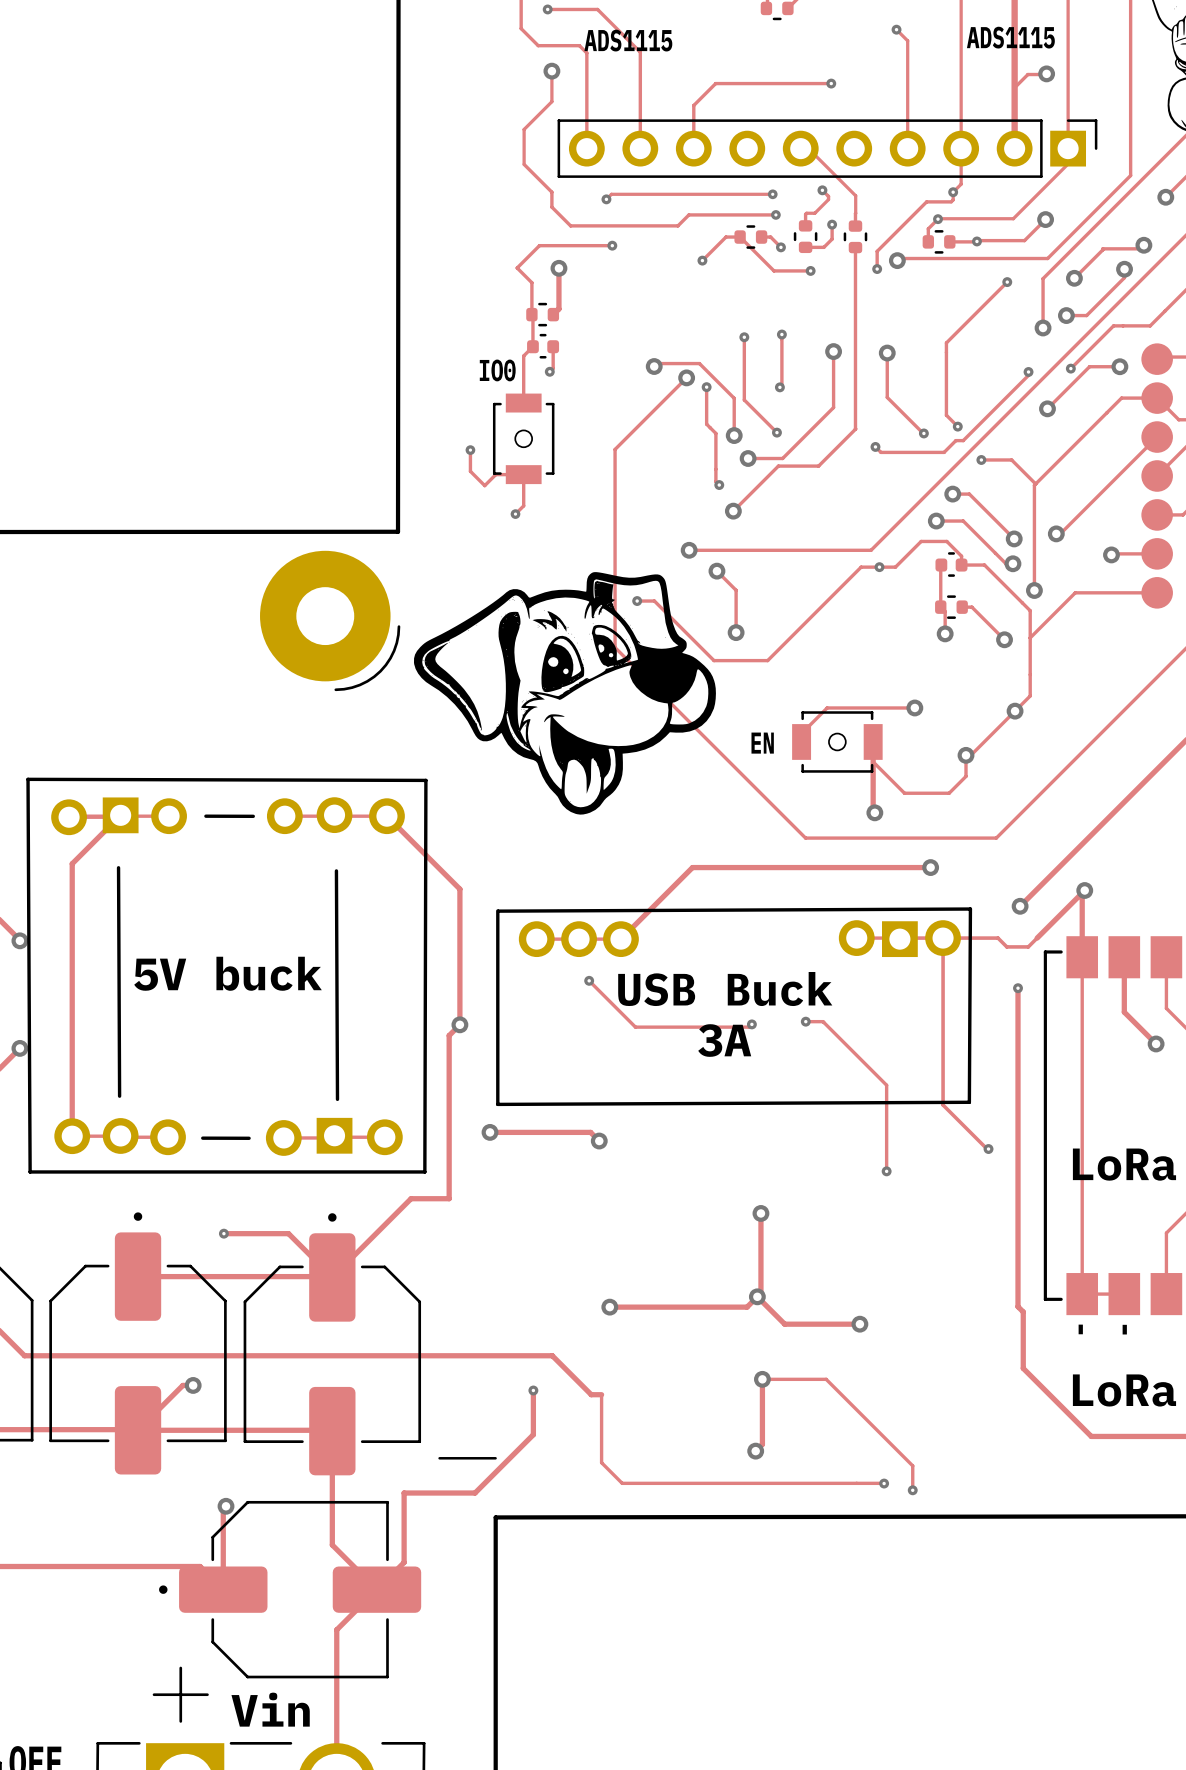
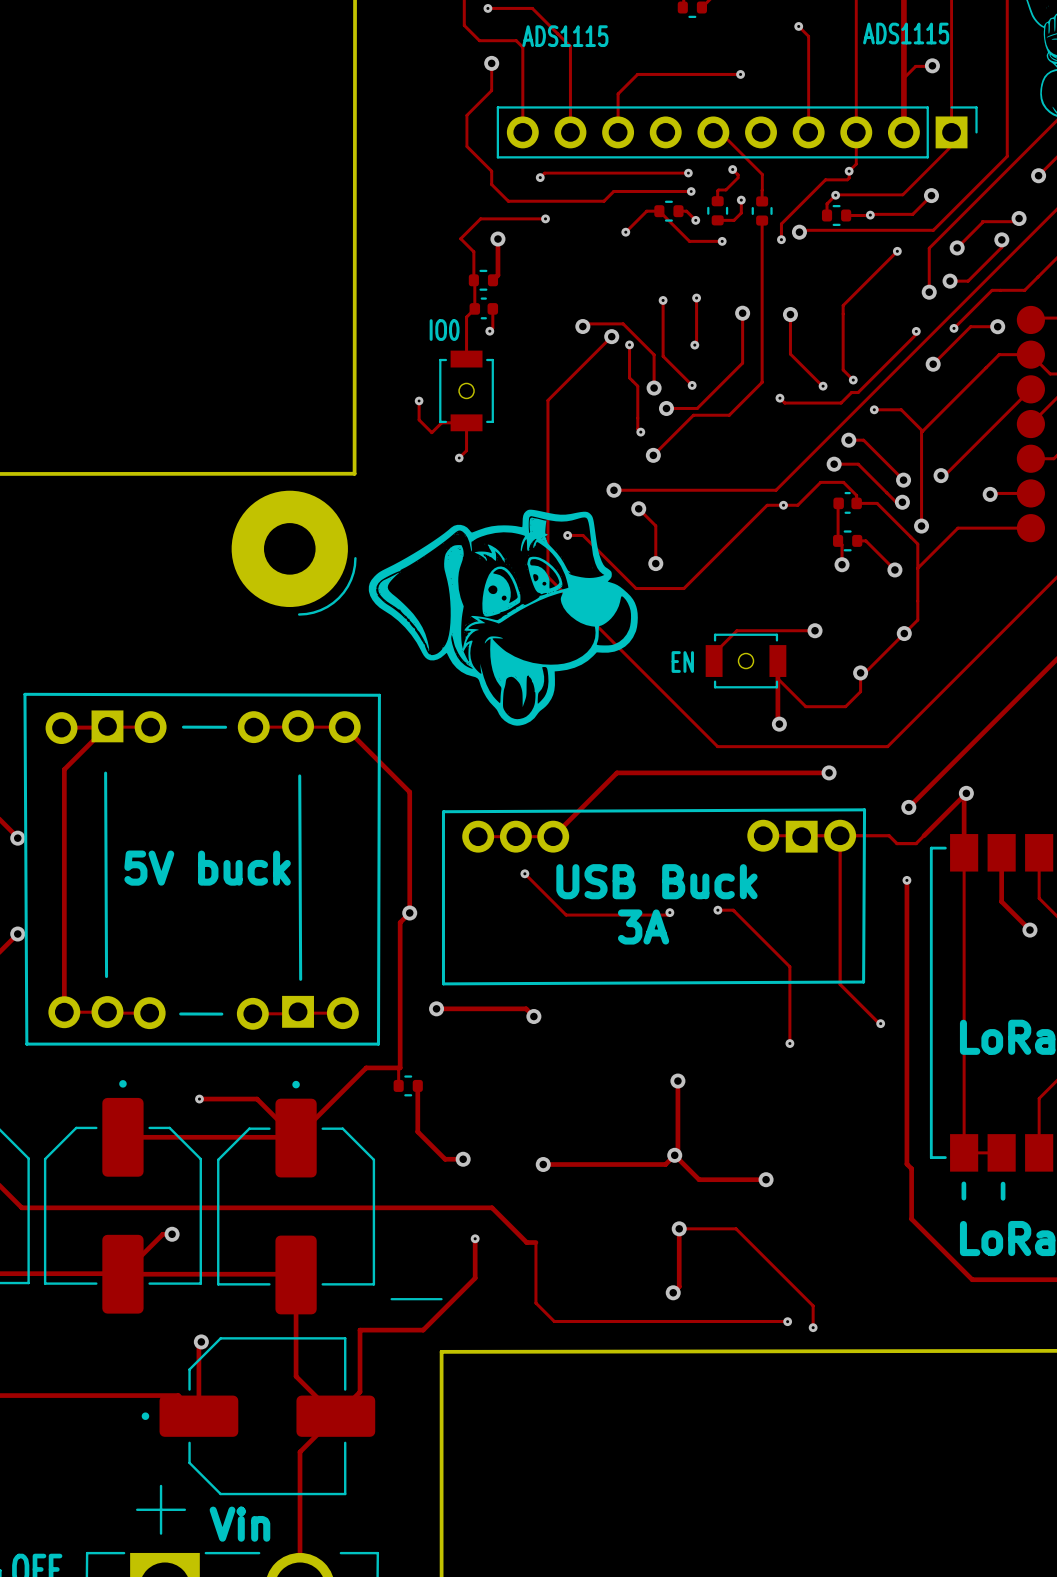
track: none -> (400, 1067) (398, 1085)
part: none -> (408, 1085)
track: none -> (417, 1085) (417, 1131) (445, 1159) (463, 1159)
via: none -> (463, 1159)

